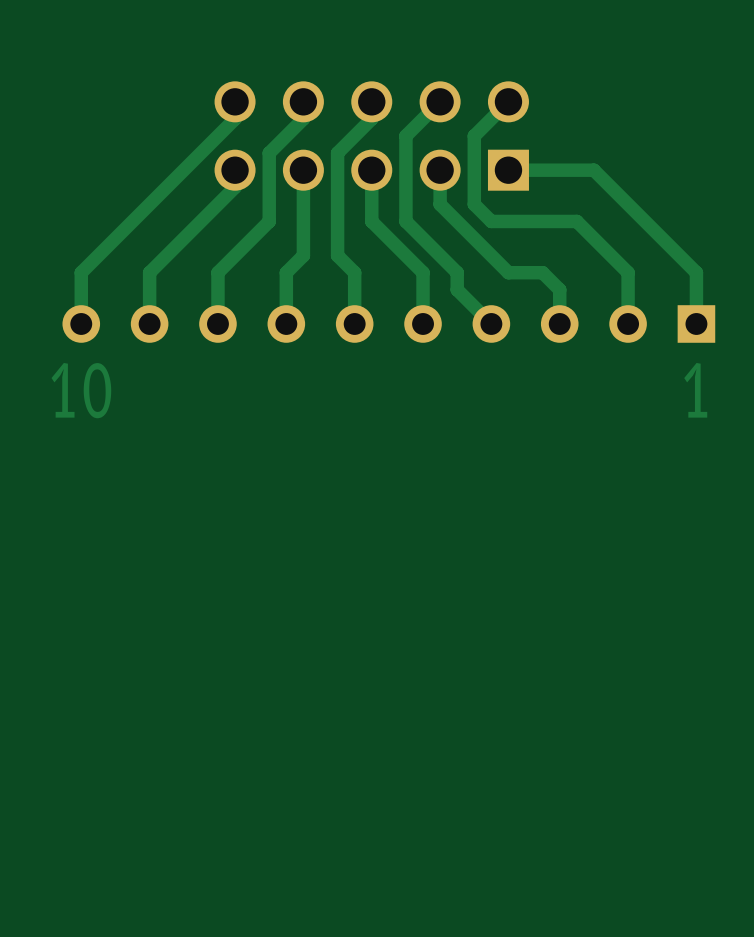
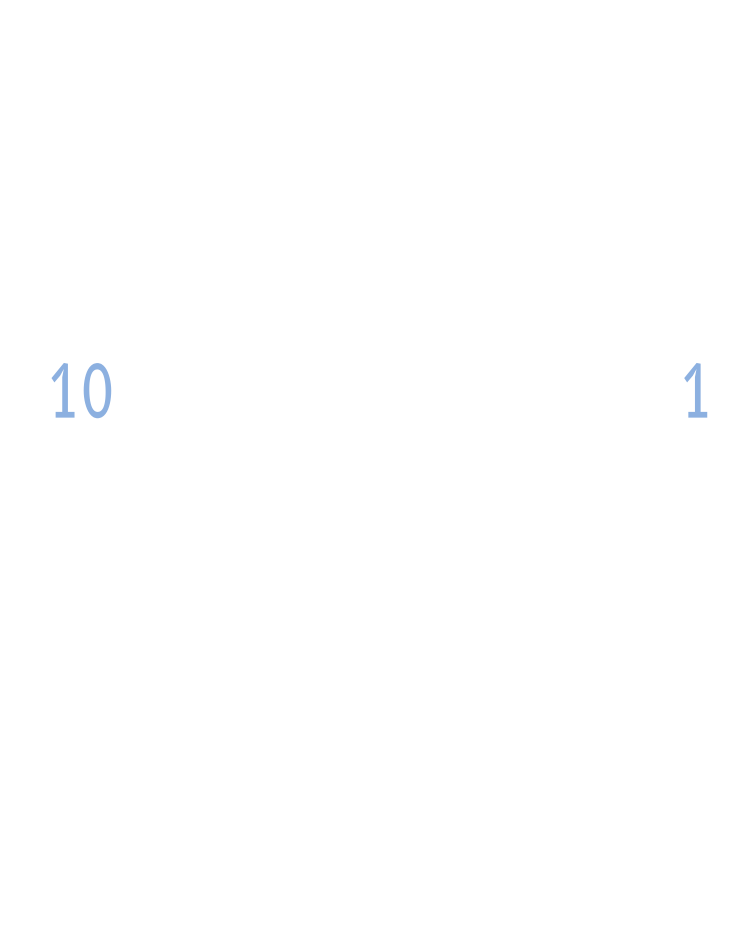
track: (235, 101) (235, 118) (81, 272) (81, 323) -> none
track: (303, 101) (303, 118) (269, 153) (269, 221) (217, 272) (217, 323) -> none
track: (371, 101) (371, 118) (337, 153) (337, 255) (354, 272) (354, 323) -> none
track: (440, 101) (405, 136) (405, 221) (457, 272) (457, 289) (491, 323) -> none
track: (508, 101) (474, 136) (474, 204) (491, 221) (576, 221) (628, 272) (628, 323) -> none
part: (371, 136) -> none
track: (235, 170) (235, 187) (149, 272) (149, 323) -> none
track: (303, 170) (303, 255) (286, 272) (286, 323) -> none
track: (371, 170) (371, 221) (423, 272) (423, 323) -> none
track: (440, 170) (440, 204) (508, 272) (542, 272) (559, 289) (559, 323) -> none
track: (508, 170) (593, 170) (696, 272) (696, 323) -> none
part: (388, 323) -> none

